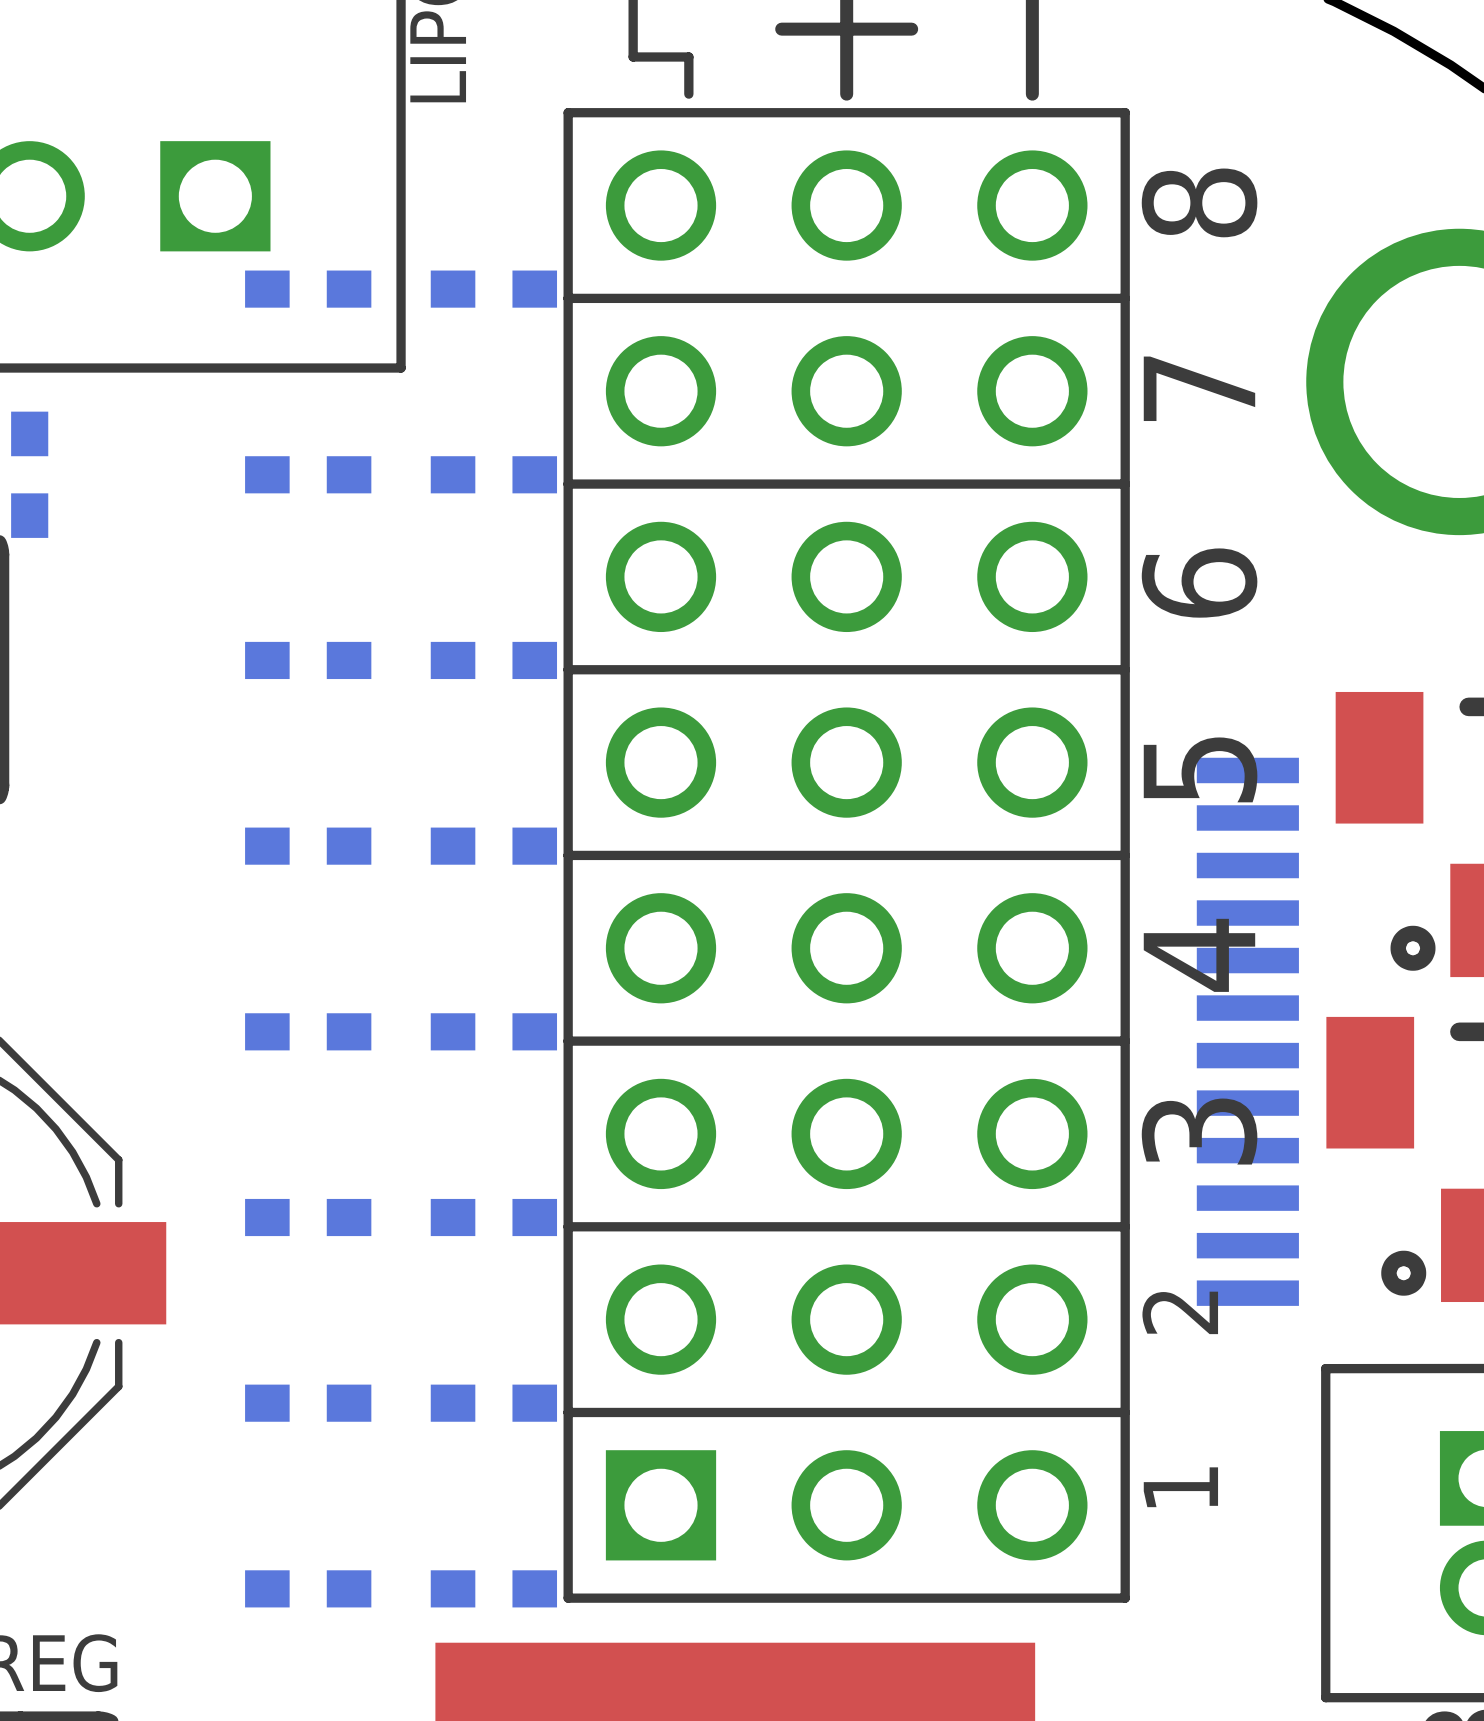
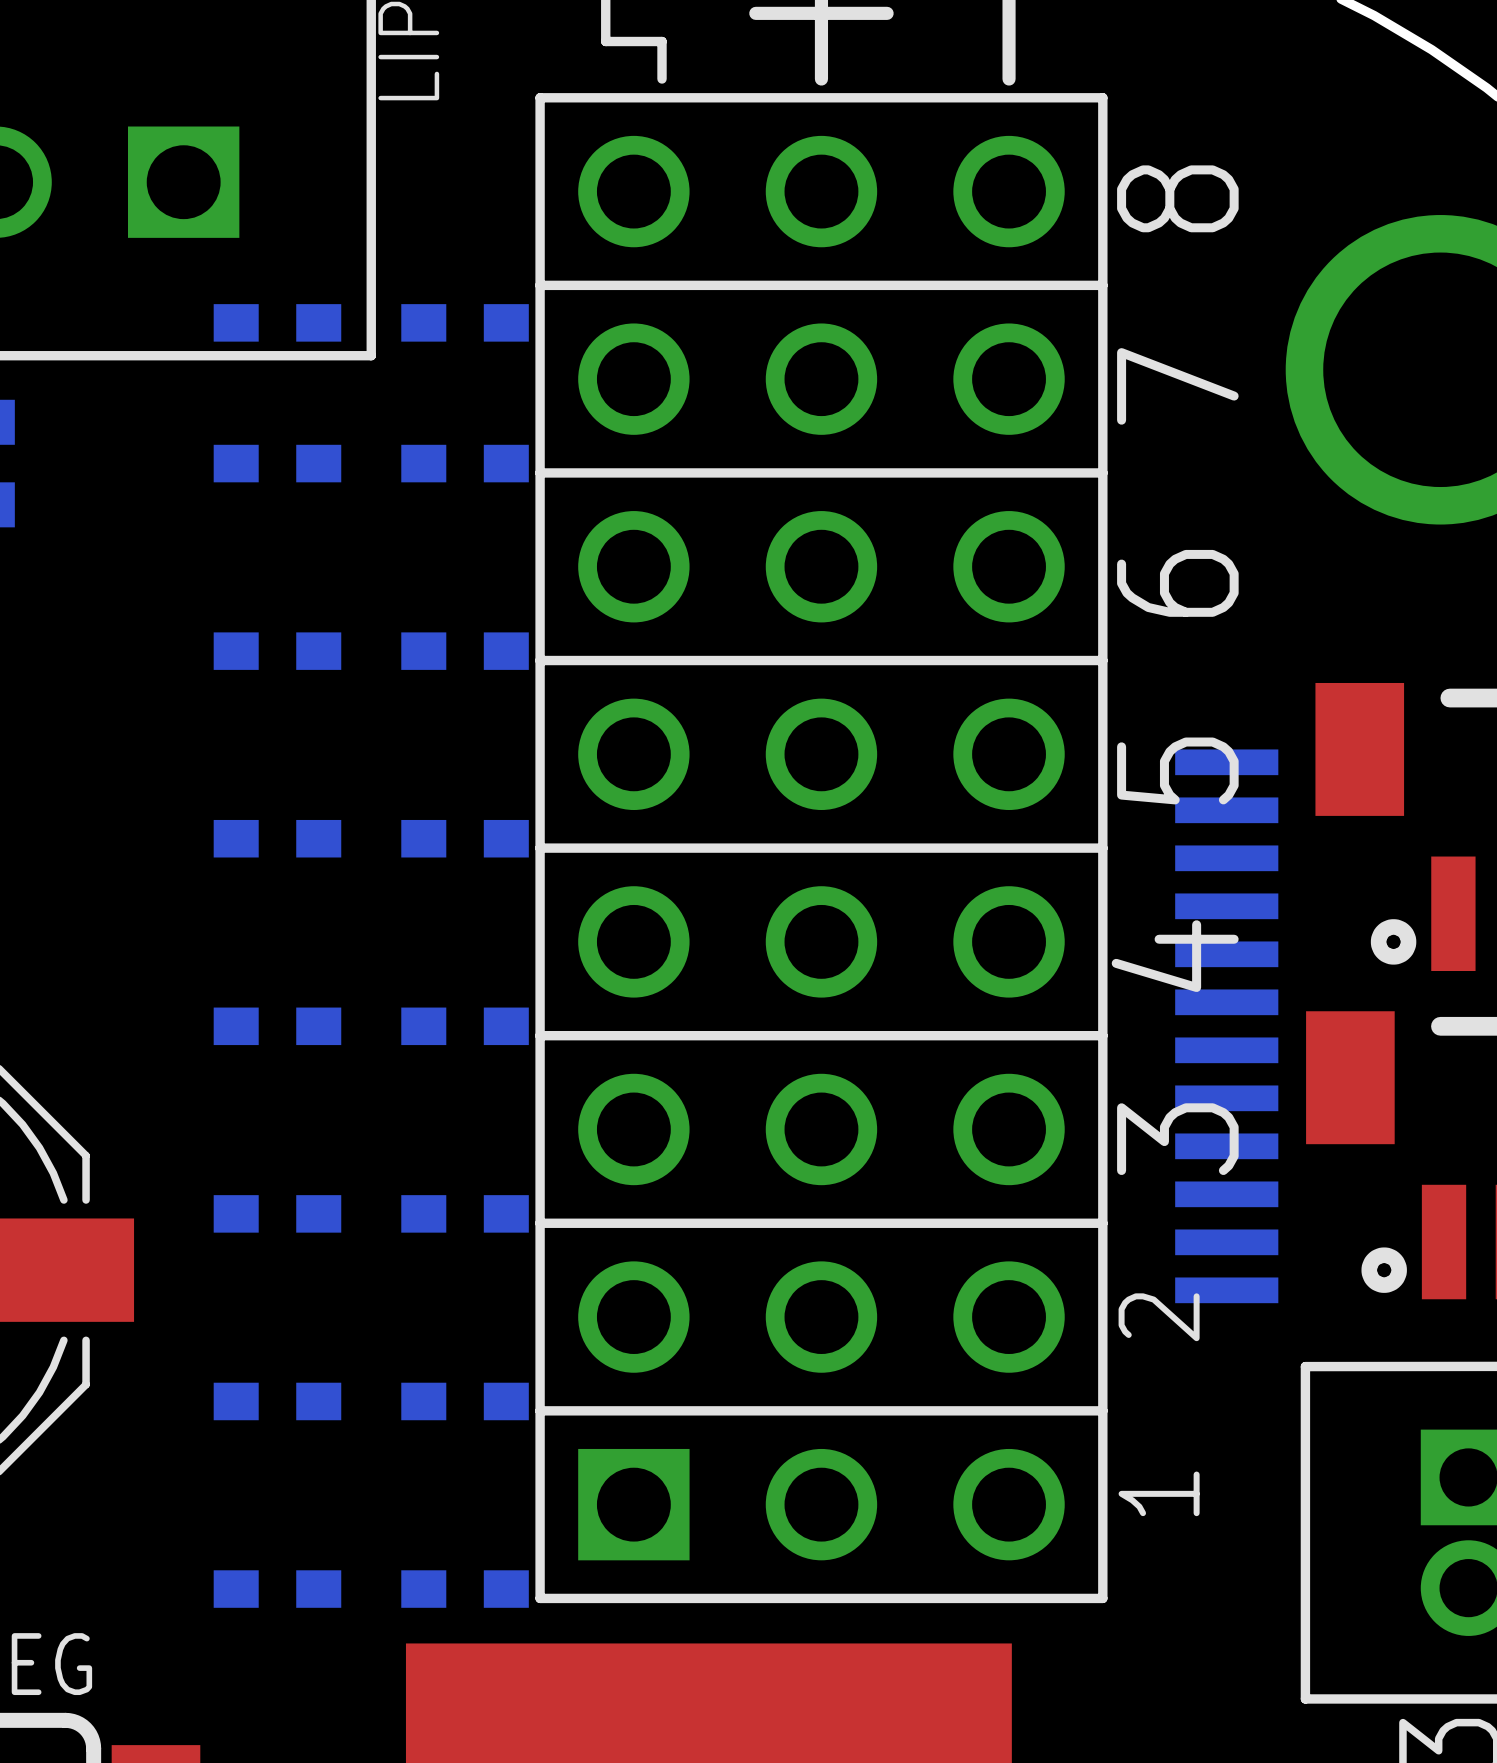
part position: (308, 289) -> (277, 322)
part position: (493, 289) -> (465, 322)

